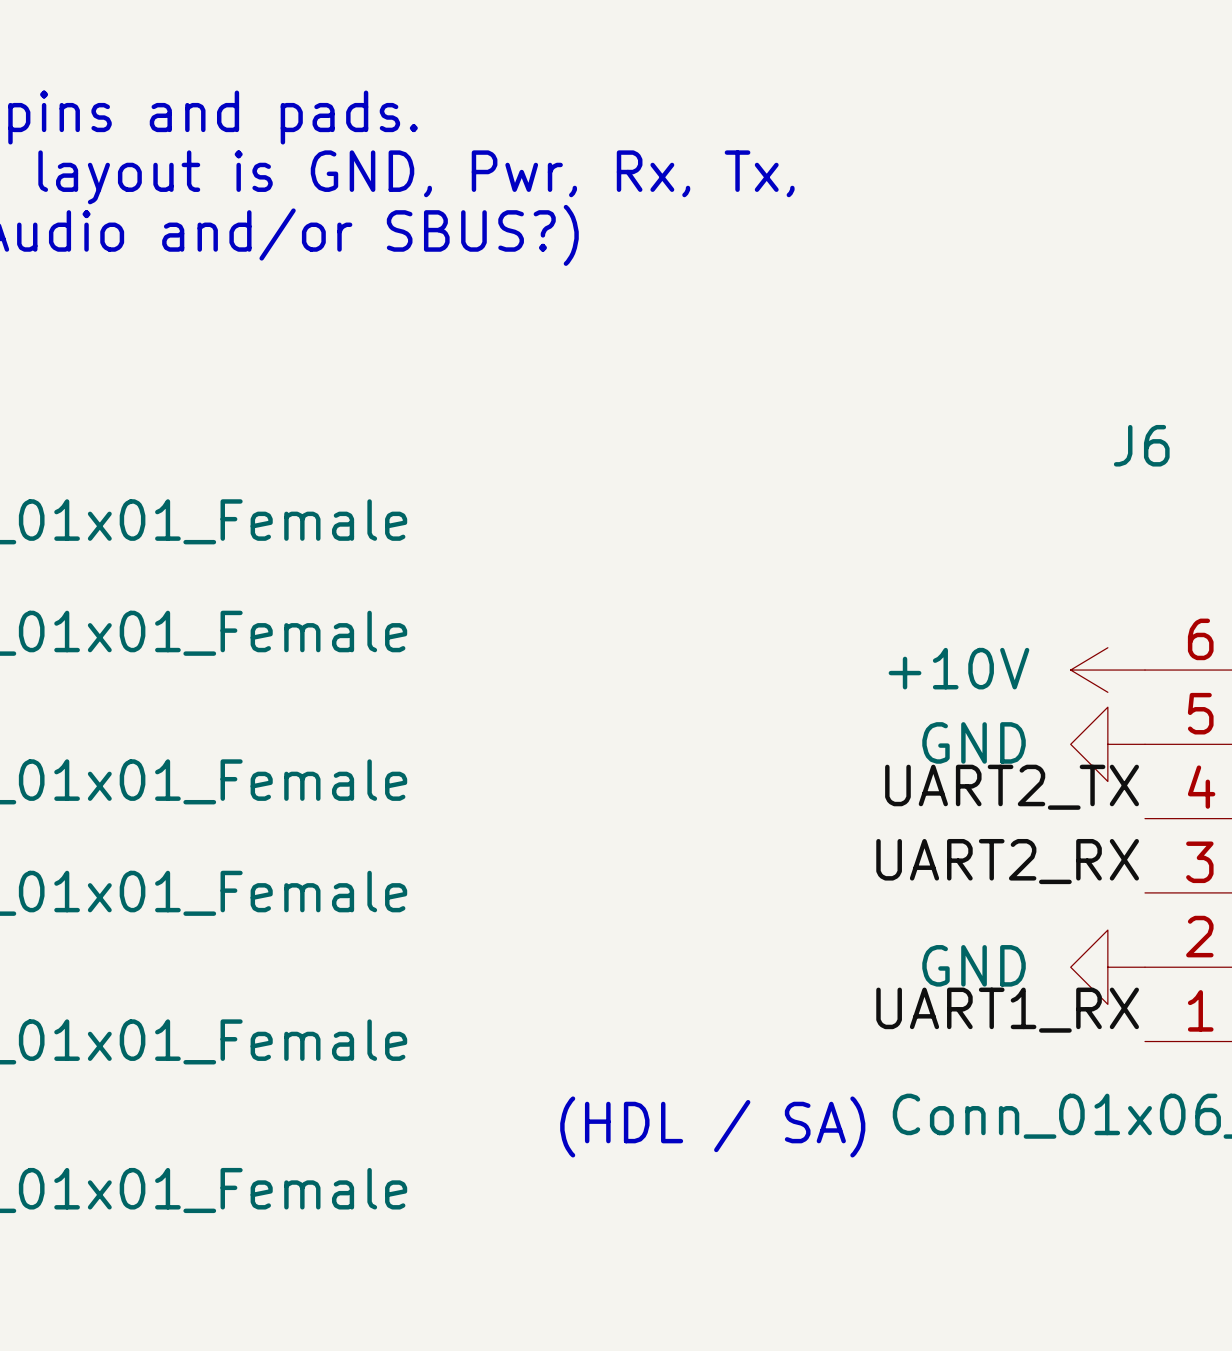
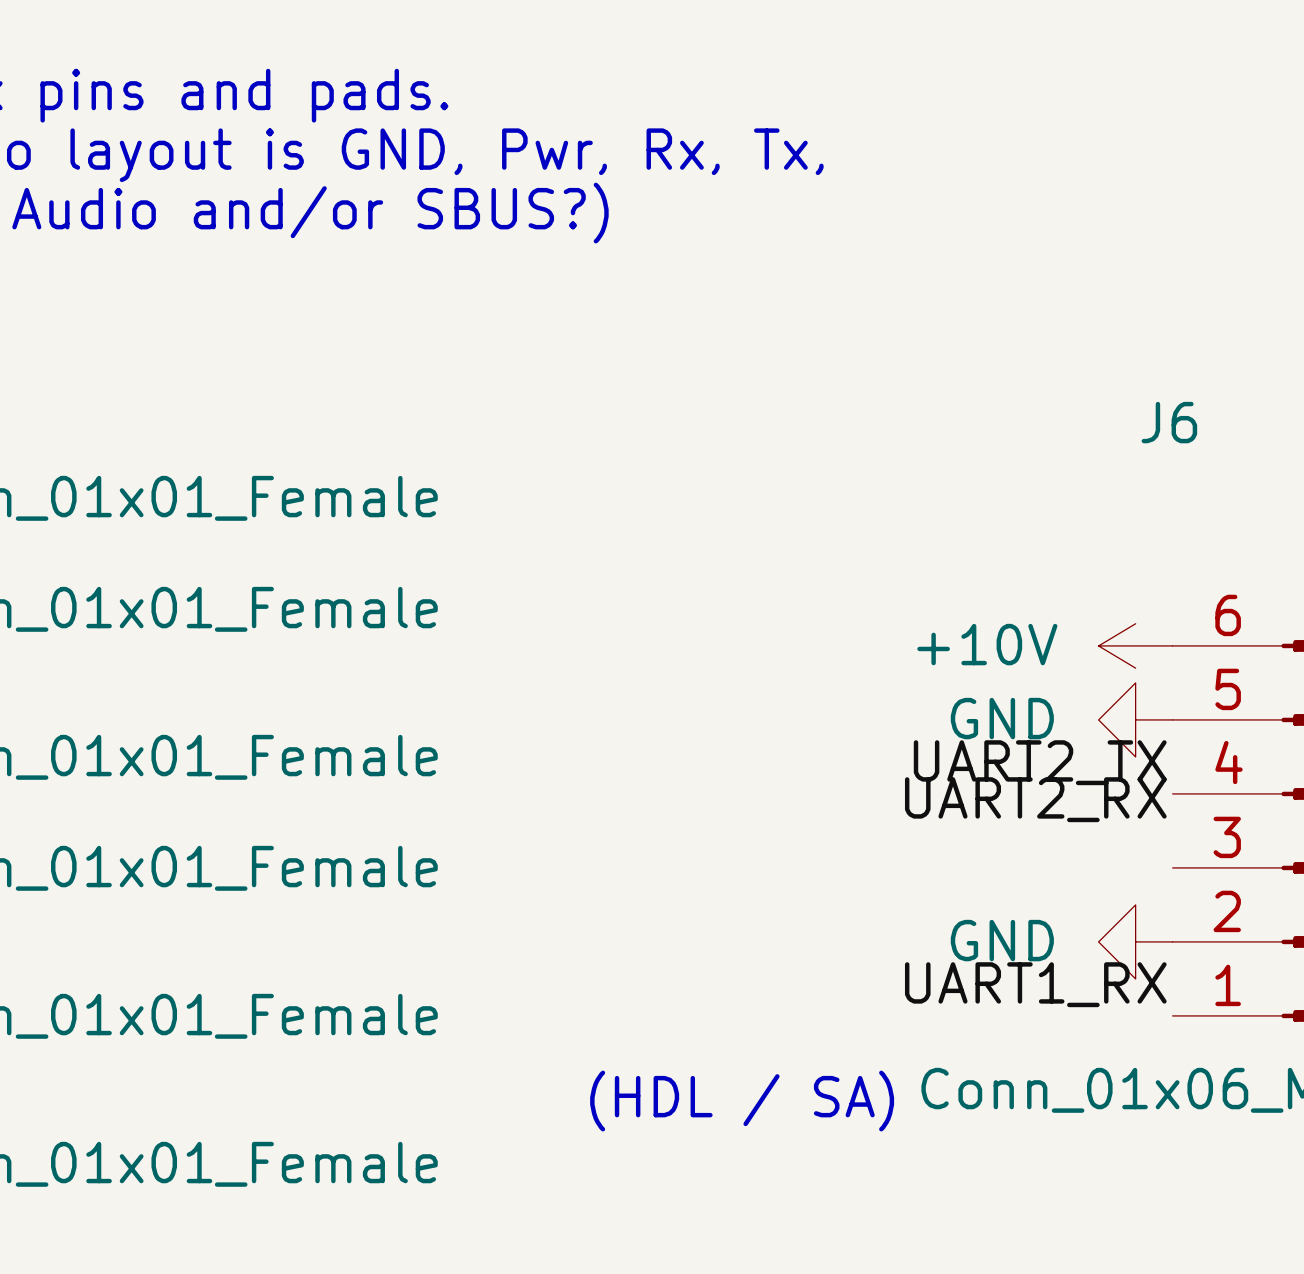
label position: UART2_RX (1007, 861) -> UART2_RX (1035, 799)

